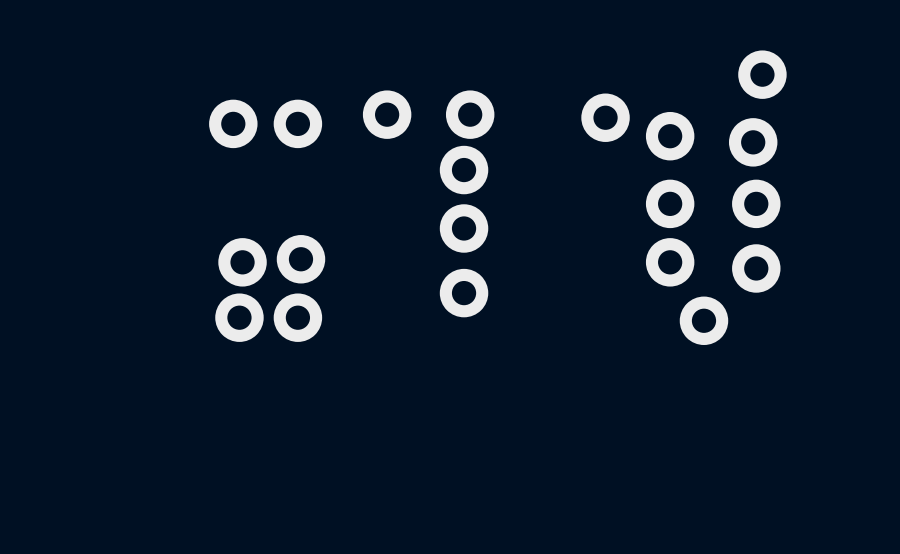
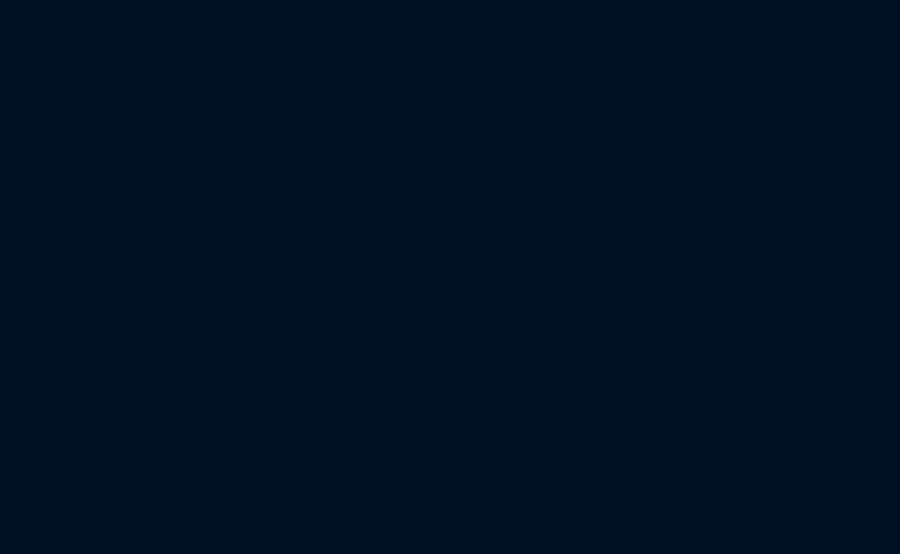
via: (762, 74) -> none
via: (387, 114) -> none
via: (470, 114) -> none
via: (605, 117) -> none
via: (233, 123) -> none
via: (297, 123) -> none
via: (670, 136) -> none
via: (753, 142) -> none
via: (464, 170) -> none
via: (670, 203) -> none
via: (756, 203) -> none
via: (464, 228) -> none
via: (300, 259) -> none
via: (242, 262) -> none
via: (670, 262) -> none
via: (756, 268) -> none
via: (464, 293) -> none
via: (239, 317) -> none
via: (297, 317) -> none
via: (703, 320) -> none

